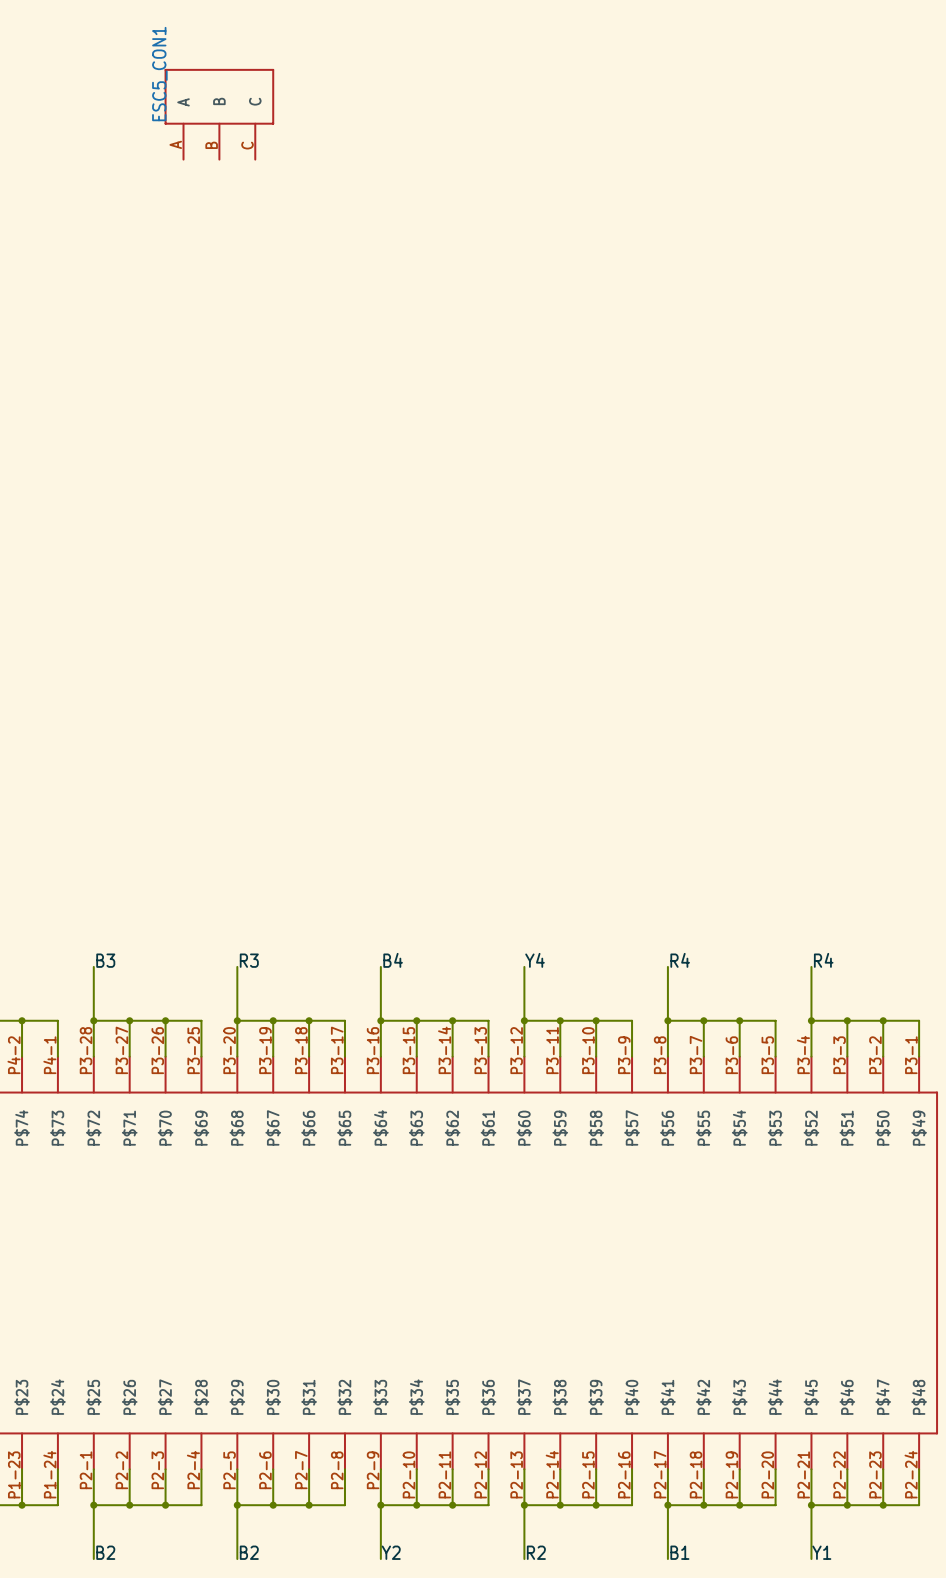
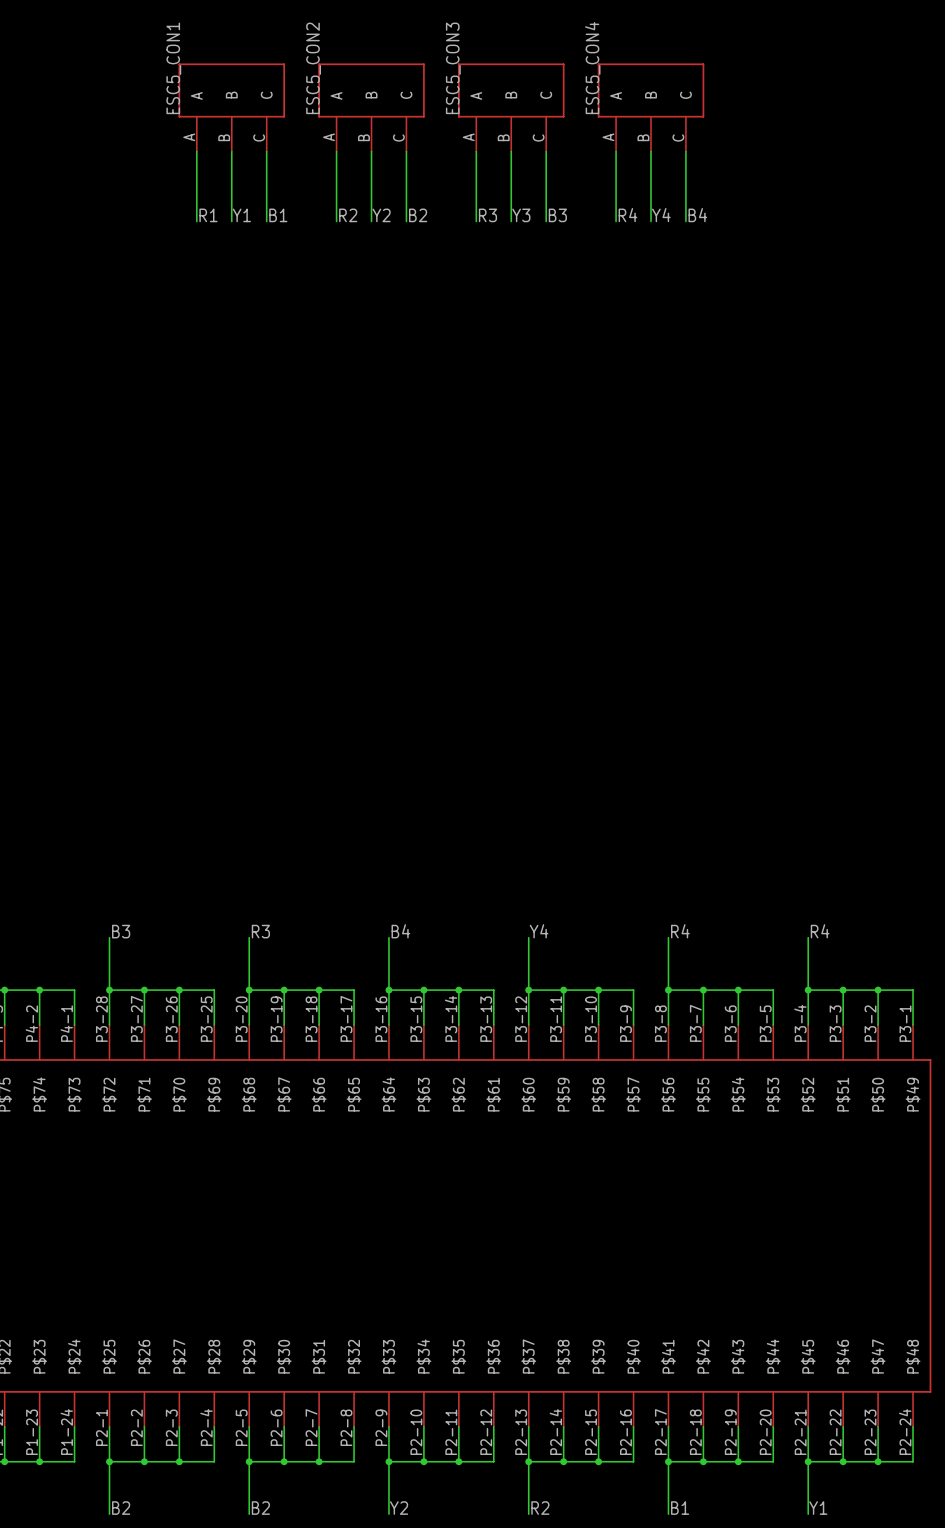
ESC5_CON2: none -> (371, 107)
ESC5_CON3: none -> (511, 107)
ESC5_CON4: none -> (651, 107)
wire: none -> (196, 151) (196, 221)
wire: none -> (231, 151) (231, 221)
wire: none -> (266, 151) (266, 221)
wire: none -> (336, 151) (336, 221)
wire: none -> (371, 151) (371, 221)
wire: none -> (406, 151) (406, 221)
wire: none -> (476, 151) (476, 221)
wire: none -> (511, 151) (511, 221)
wire: none -> (546, 151) (546, 221)
wire: none -> (616, 151) (616, 221)
wire: none -> (651, 151) (651, 221)
wire: none -> (685, 151) (685, 221)
label: none -> R4 (627, 215)
label: none -> Y4 (661, 215)
label: none -> B4 (697, 215)
label: none -> R1 (208, 215)
label: none -> Y1 (241, 215)
label: none -> B1 (278, 215)
label: none -> R2 (348, 215)
label: none -> Y2 (381, 215)
label: none -> B2 (418, 215)
label: none -> R3 (487, 215)
label: none -> Y3 (521, 215)
label: none -> B3 (557, 215)

